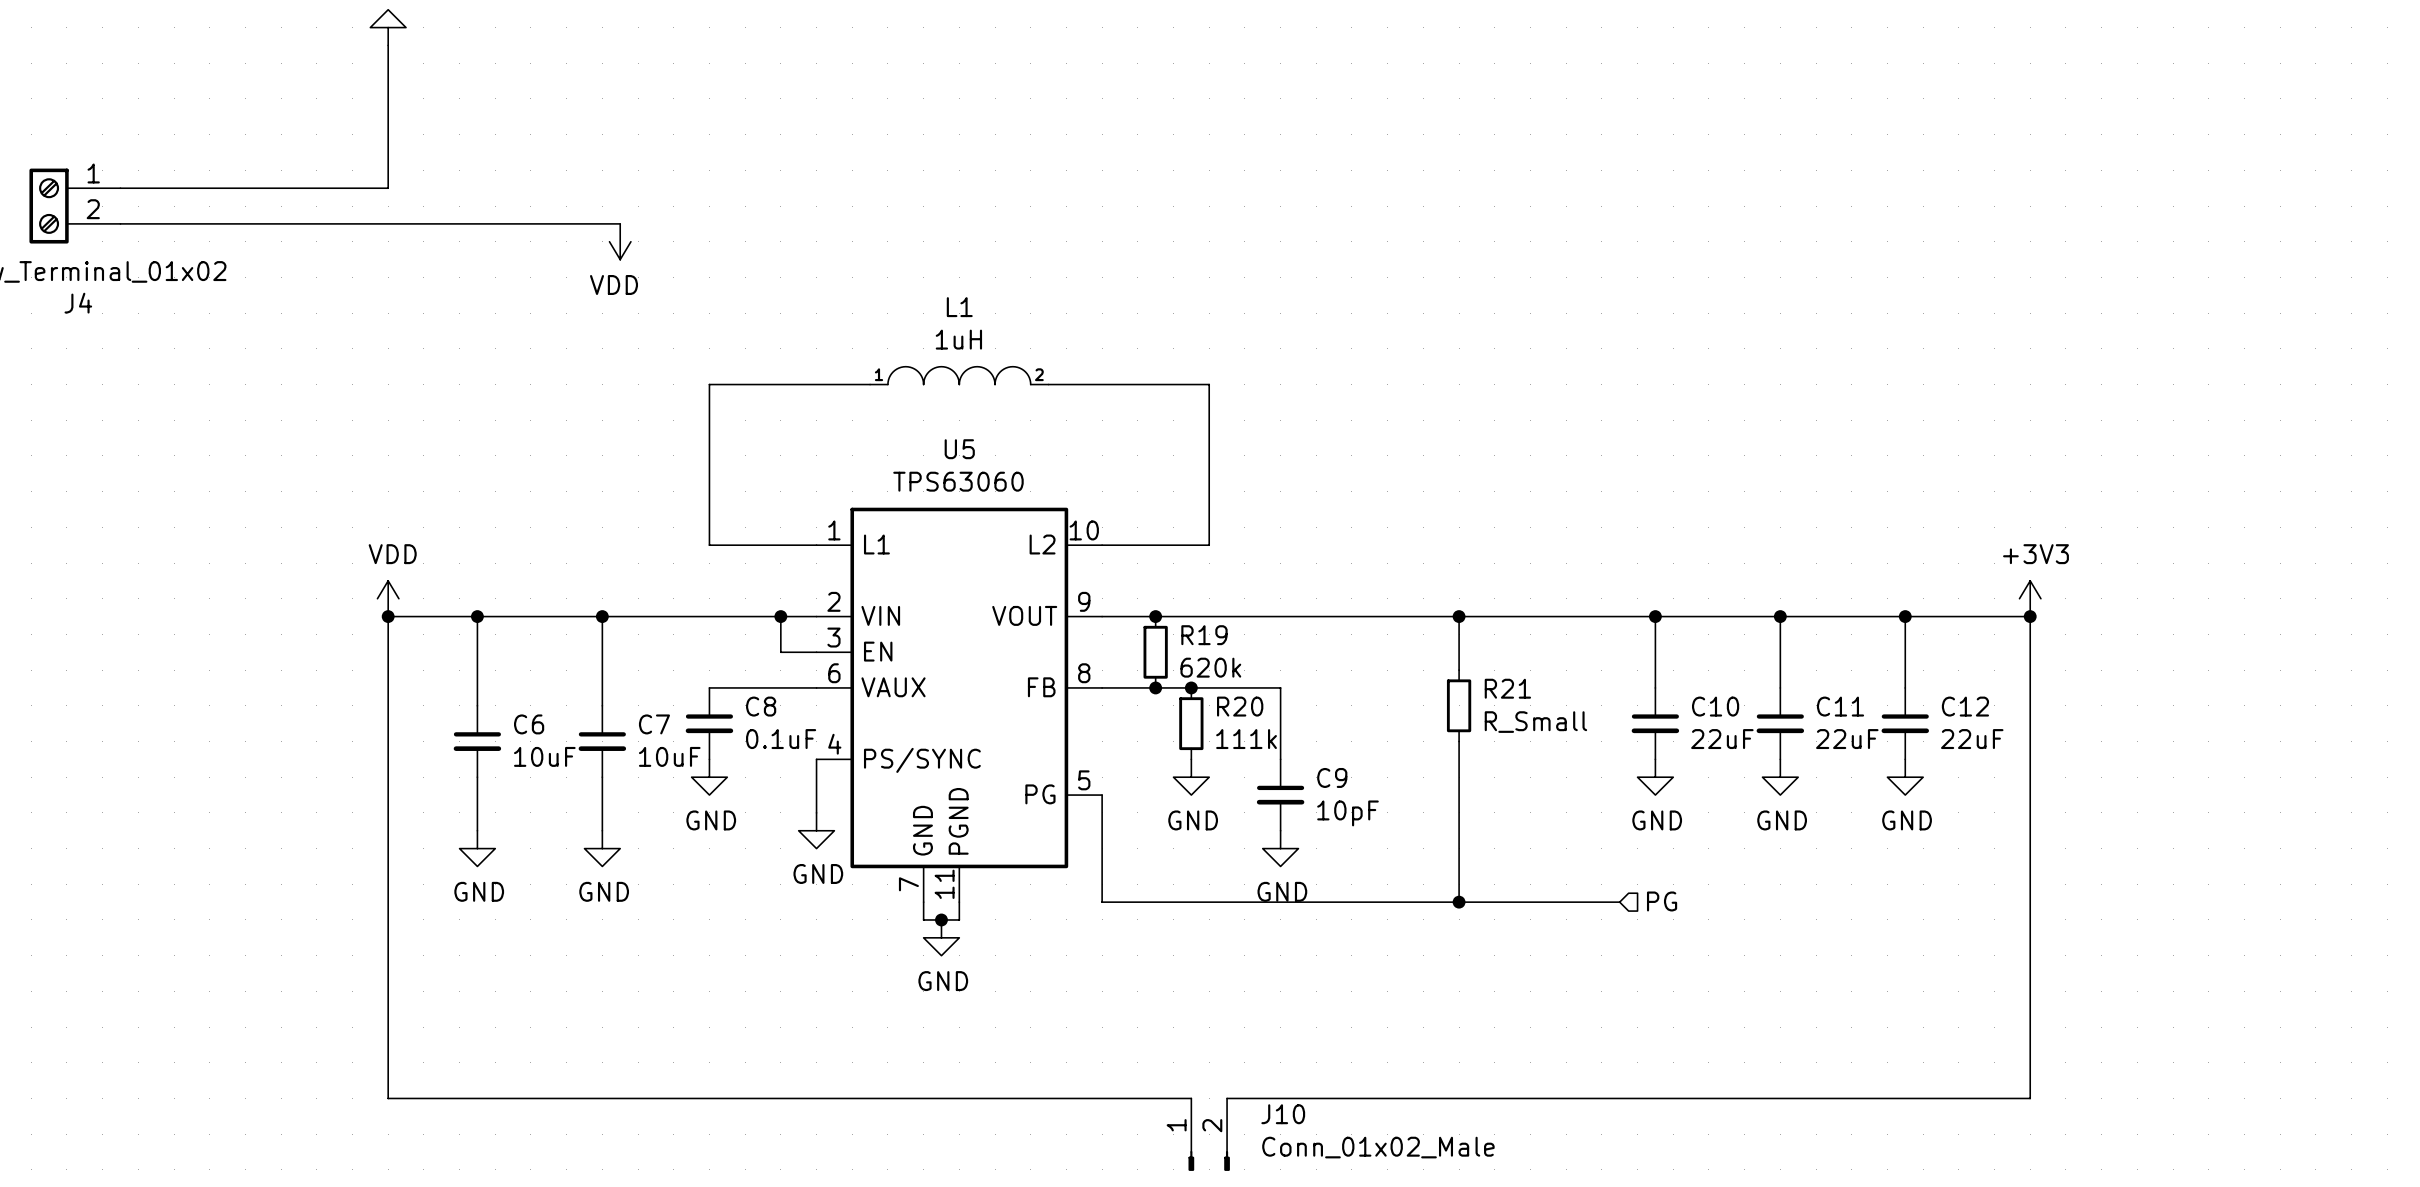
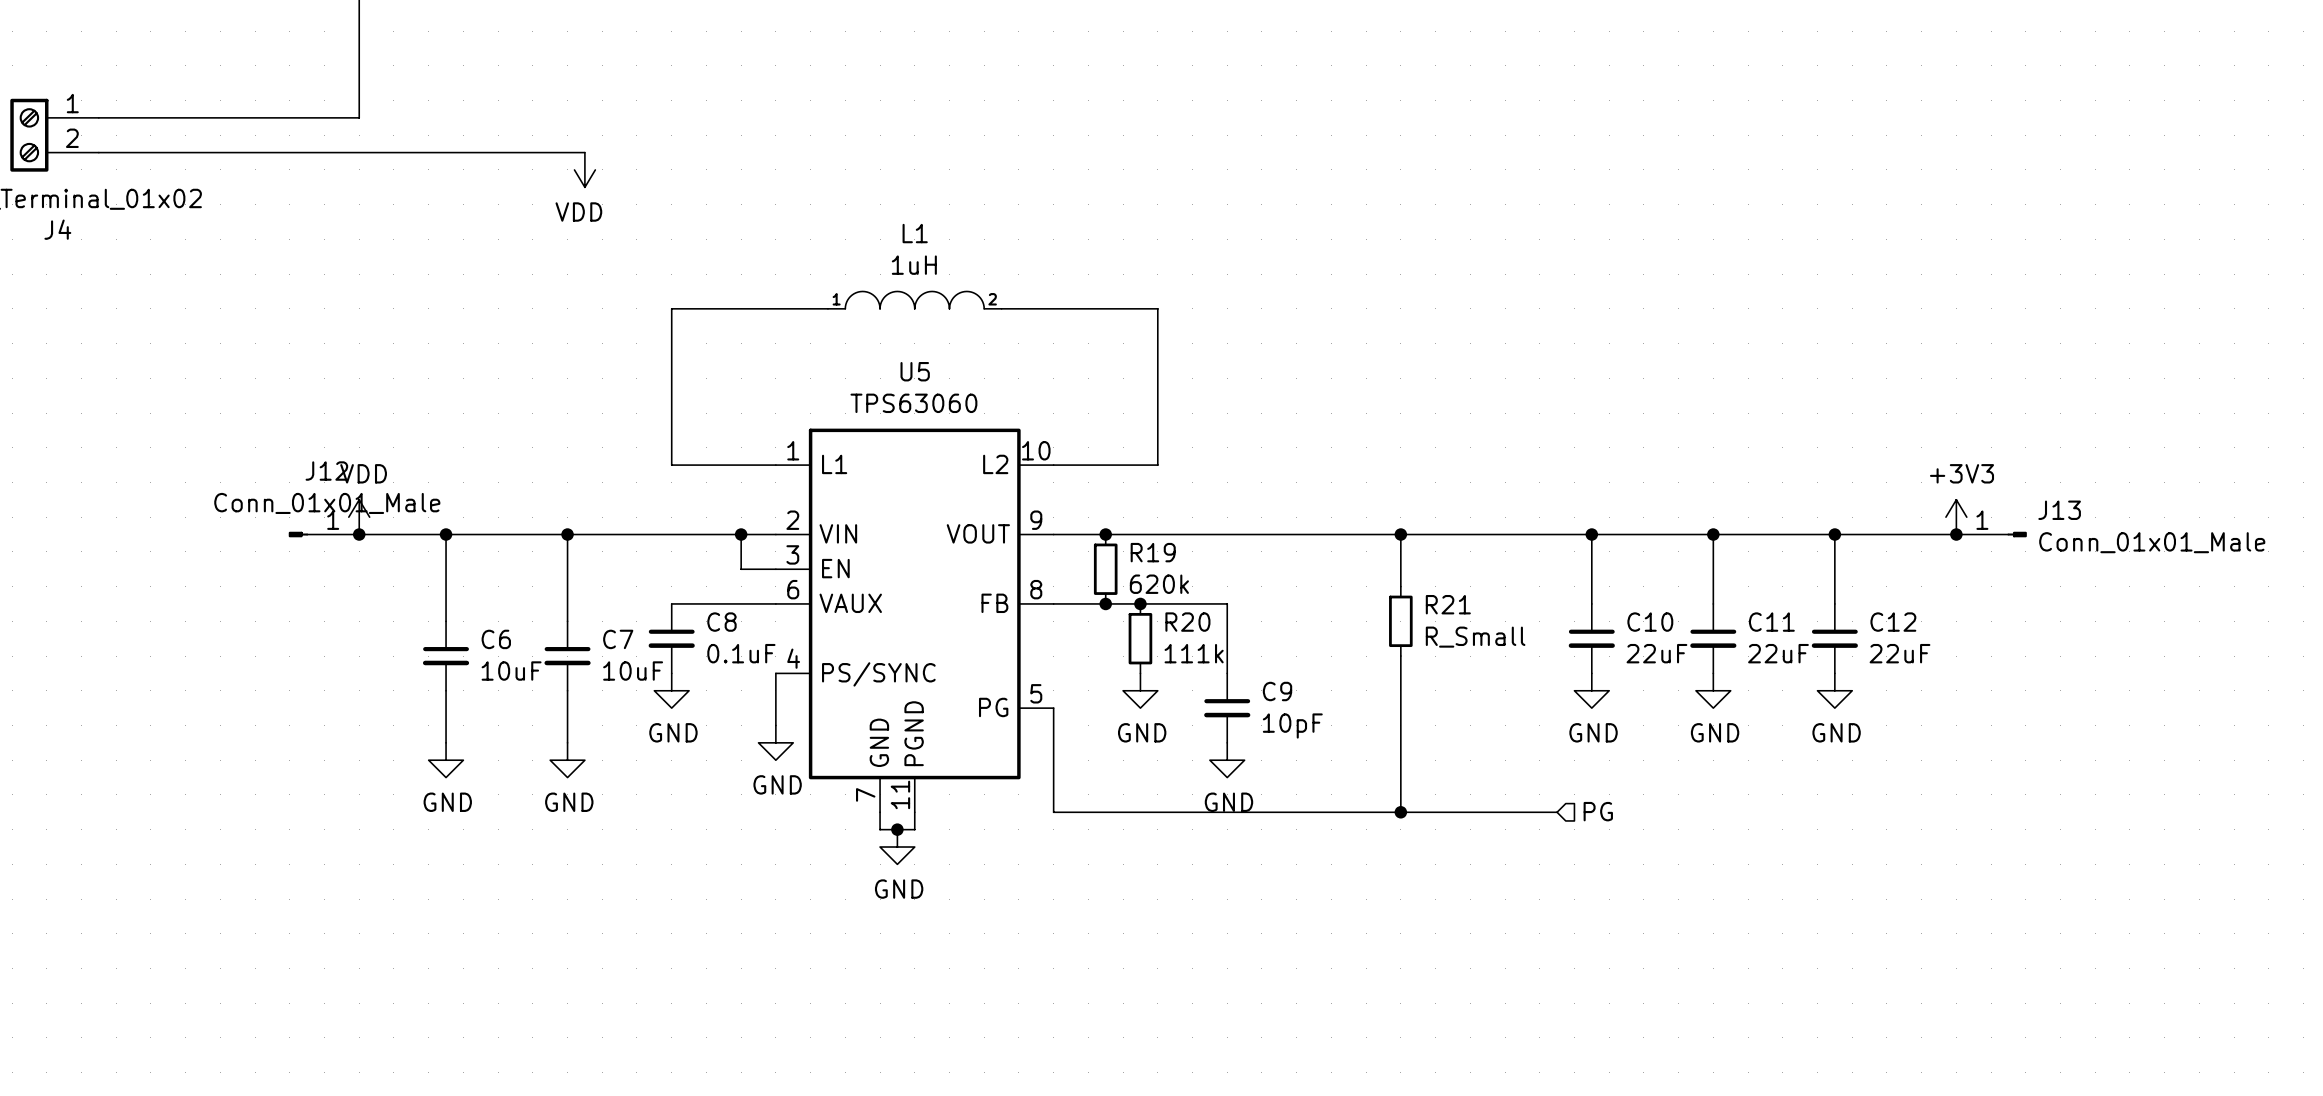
J12: none -> Conn_01x01_Male (323, 534)
wire: (388, 616) (388, 1098) (1191, 1098) -> none
wire: (2030, 616) (2030, 1098) (1227, 1098) -> none
J13: none -> Conn_01x01_Male (1991, 534)
J10: Conn_01x02_Male (1209, 1134) -> none

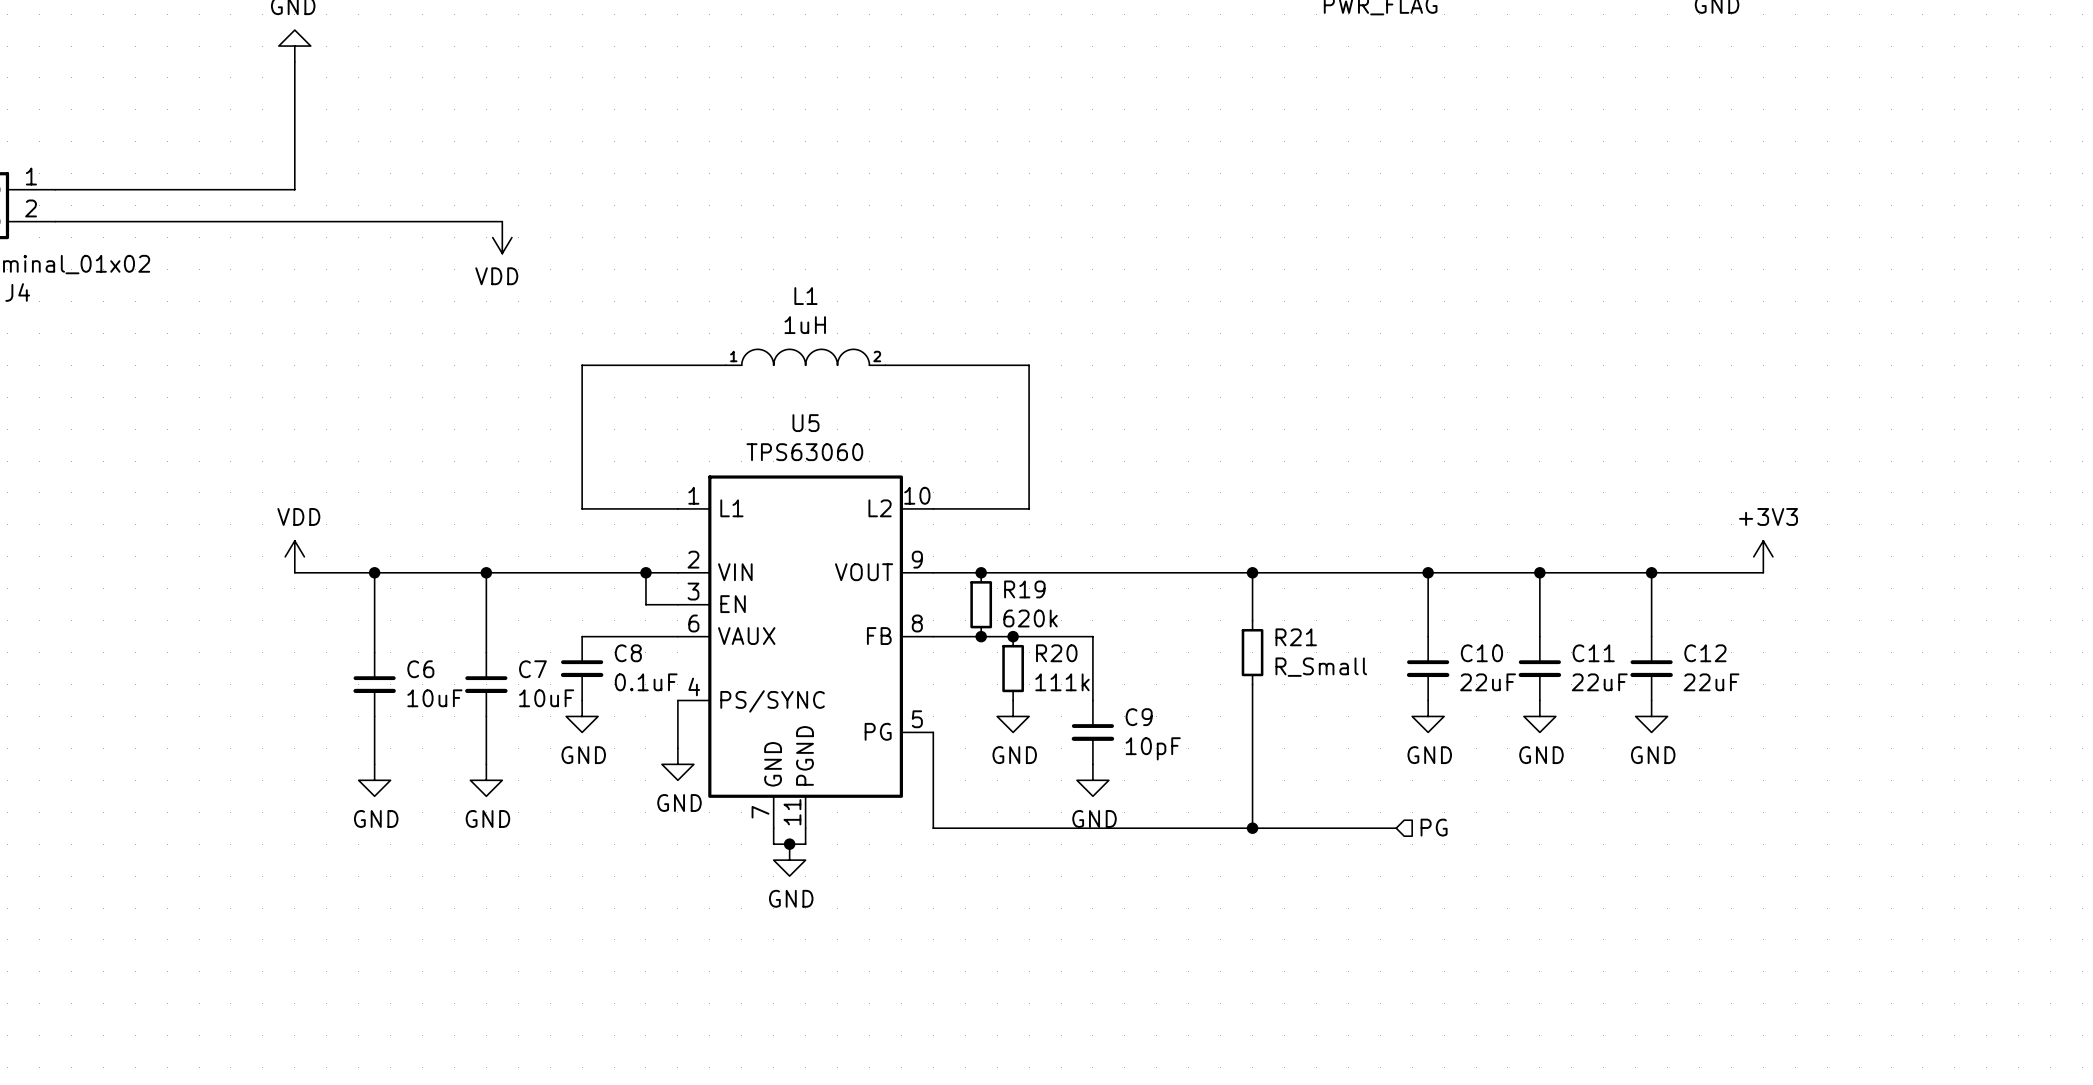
J12: Conn_01x01_Male (323, 534) -> none
junction: (359, 534) -> none
junction: (1956, 534) -> none
J13: Conn_01x01_Male (1991, 534) -> none

